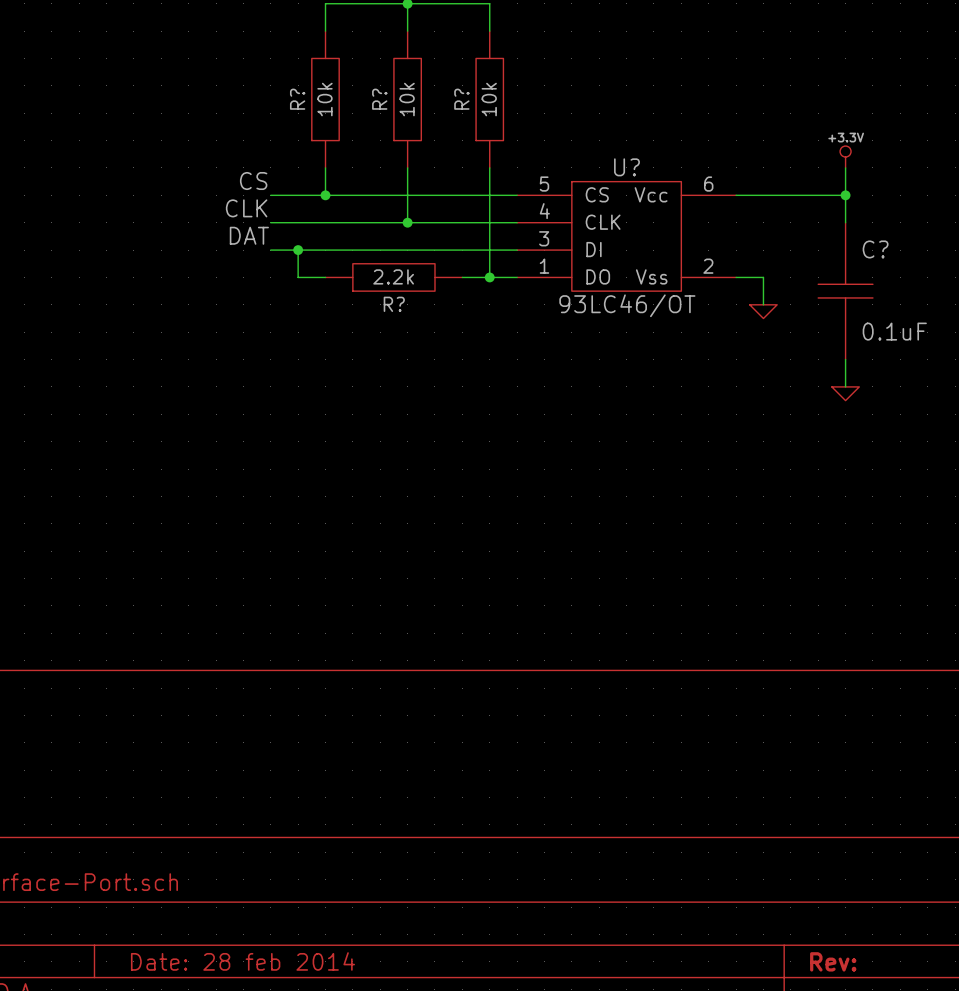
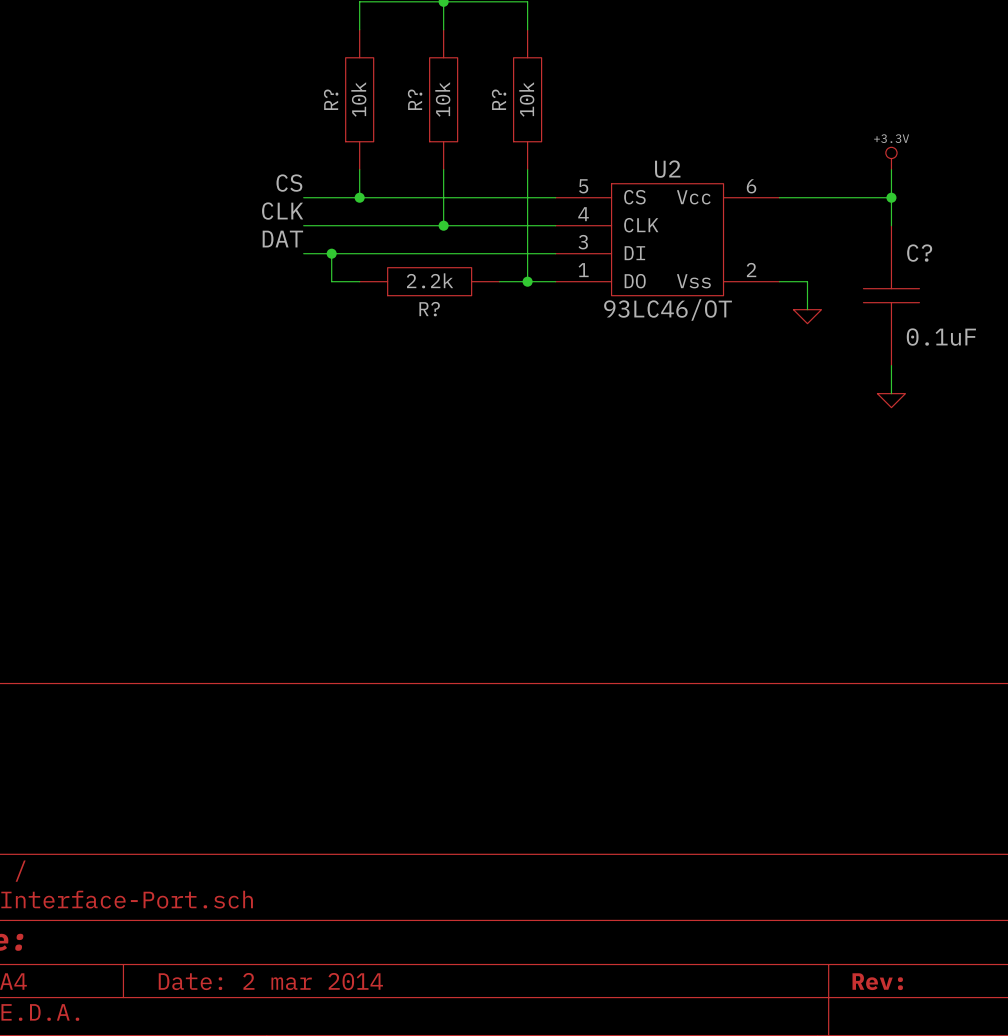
U? name: U? (626, 167) -> U2 (667, 169)
title block: Date: 28 feb 2014 (242, 961) -> Date: 2 mar 2014 (270, 981)

